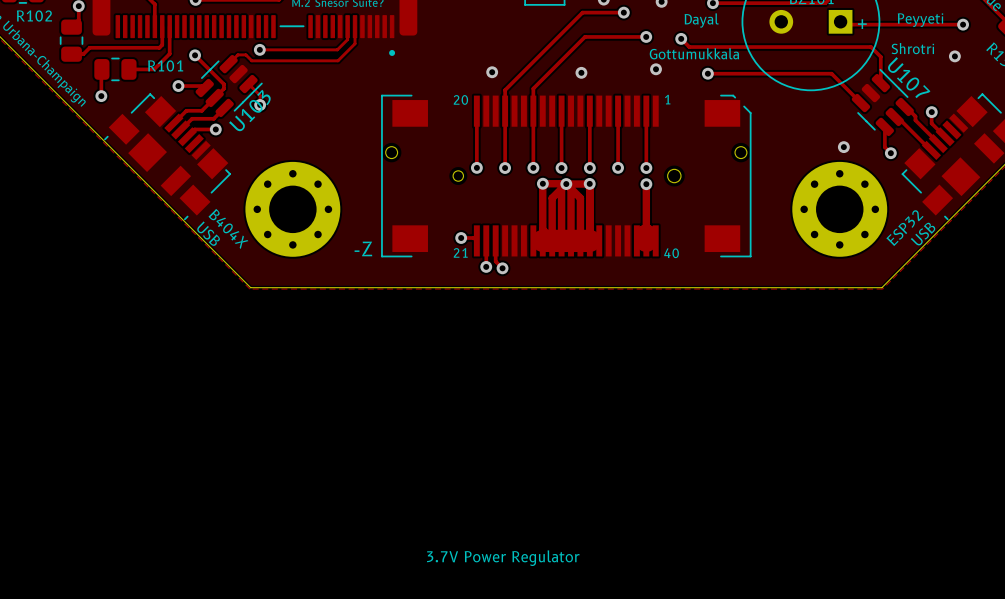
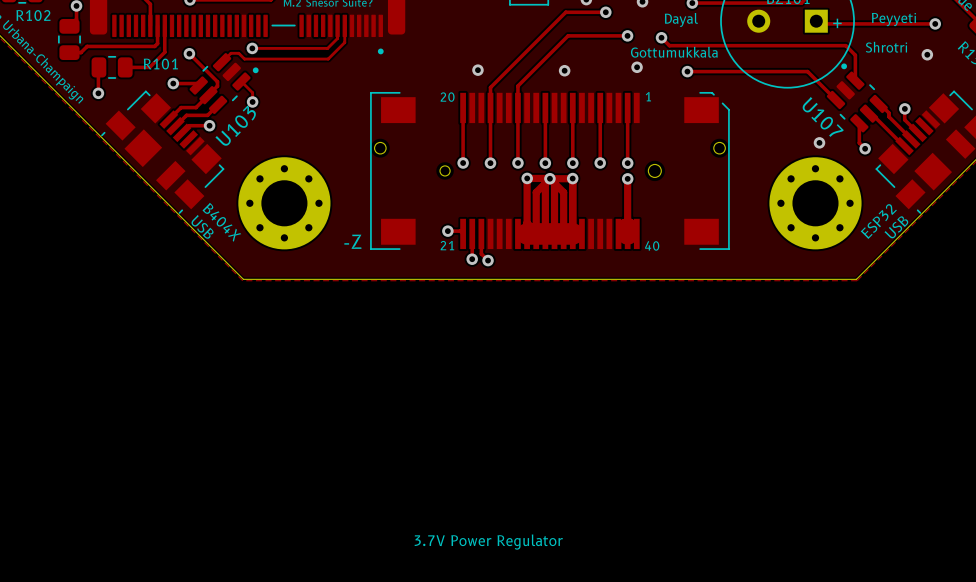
U103 footprint: [195, 54, 263, 118] -> [189, 53, 259, 115]
U107 footprint: [851, 68, 914, 137] -> [826, 63, 888, 133]
U107 name position: U107 (909, 77) -> U107 (823, 116)

